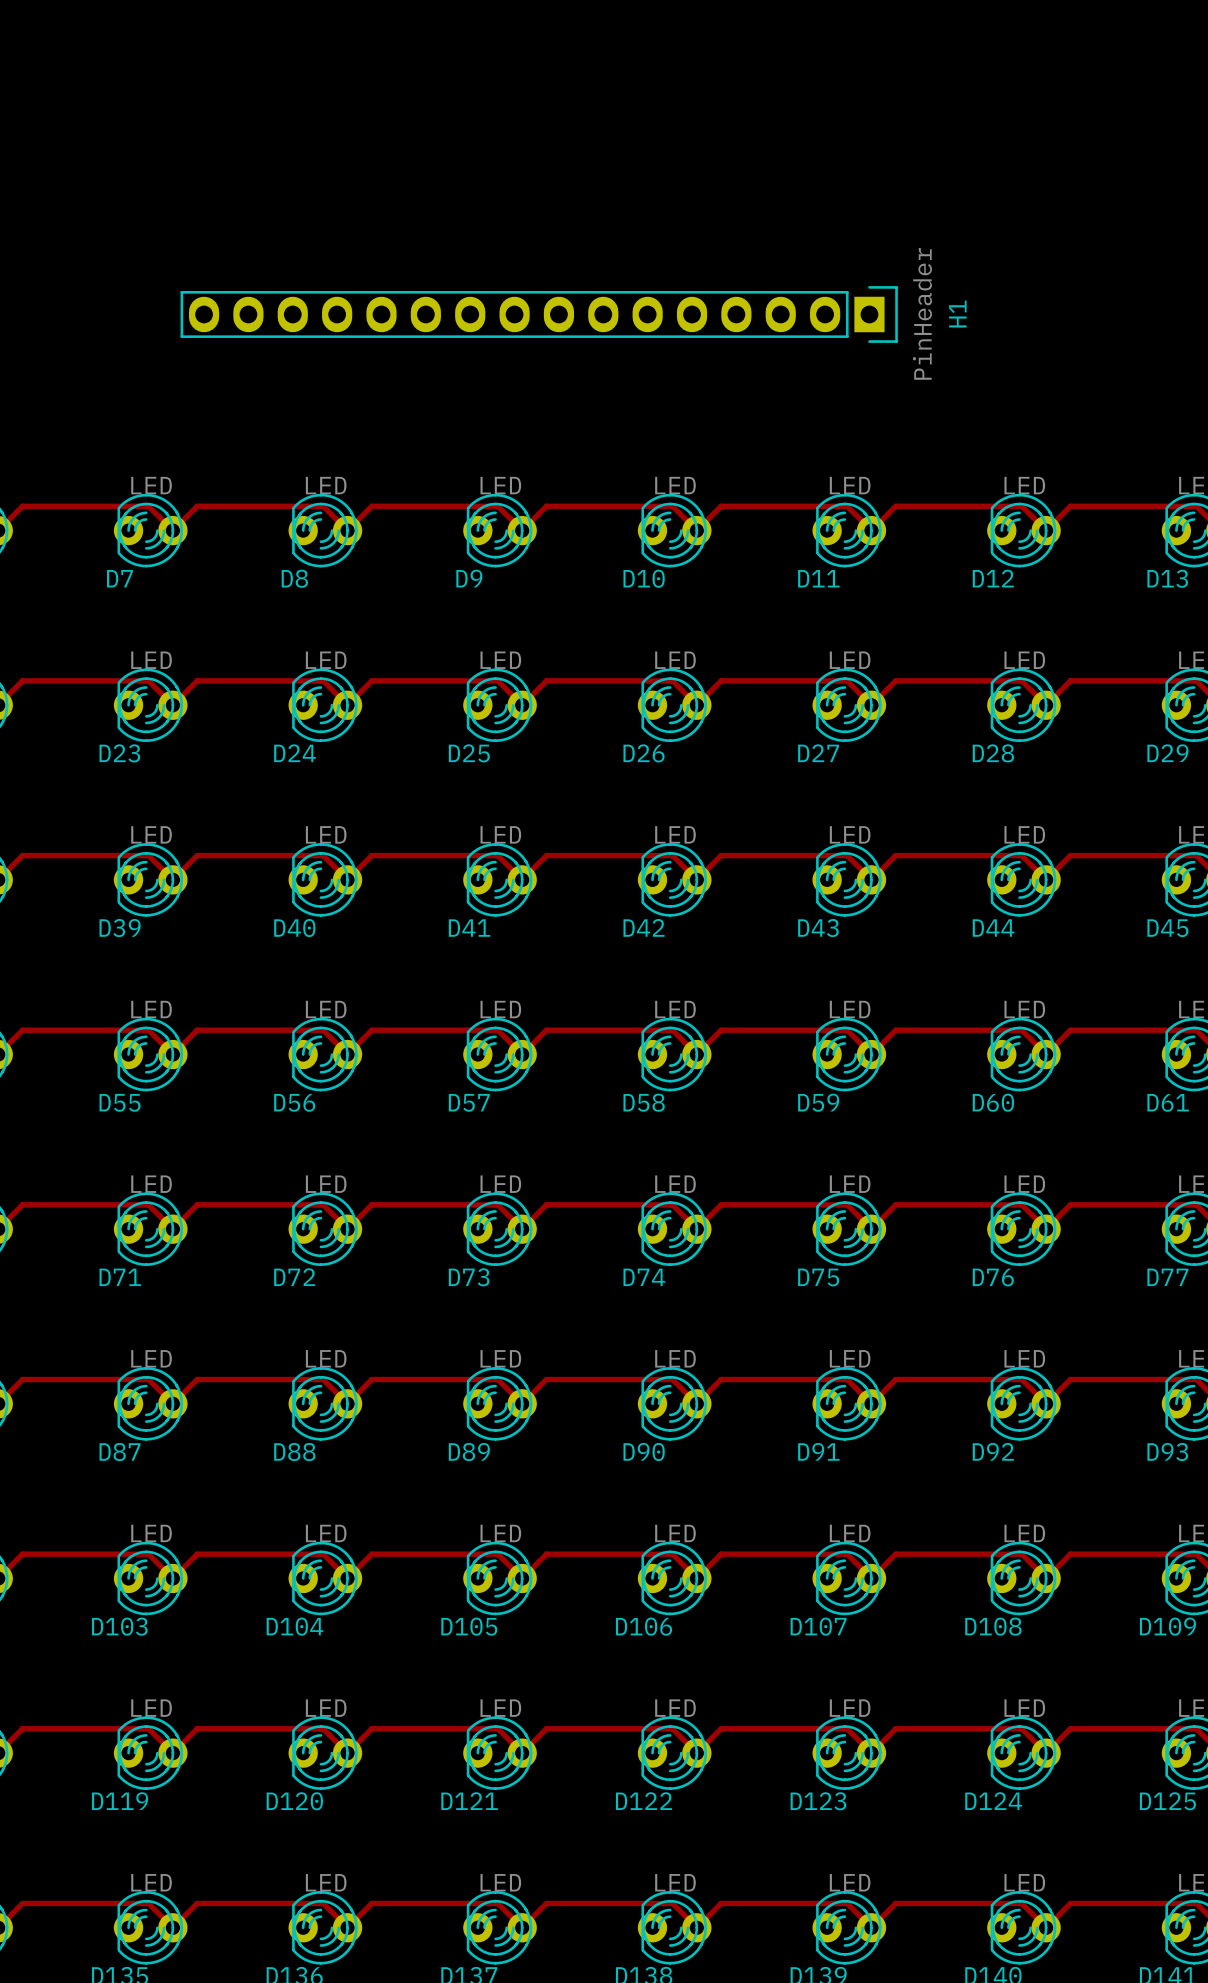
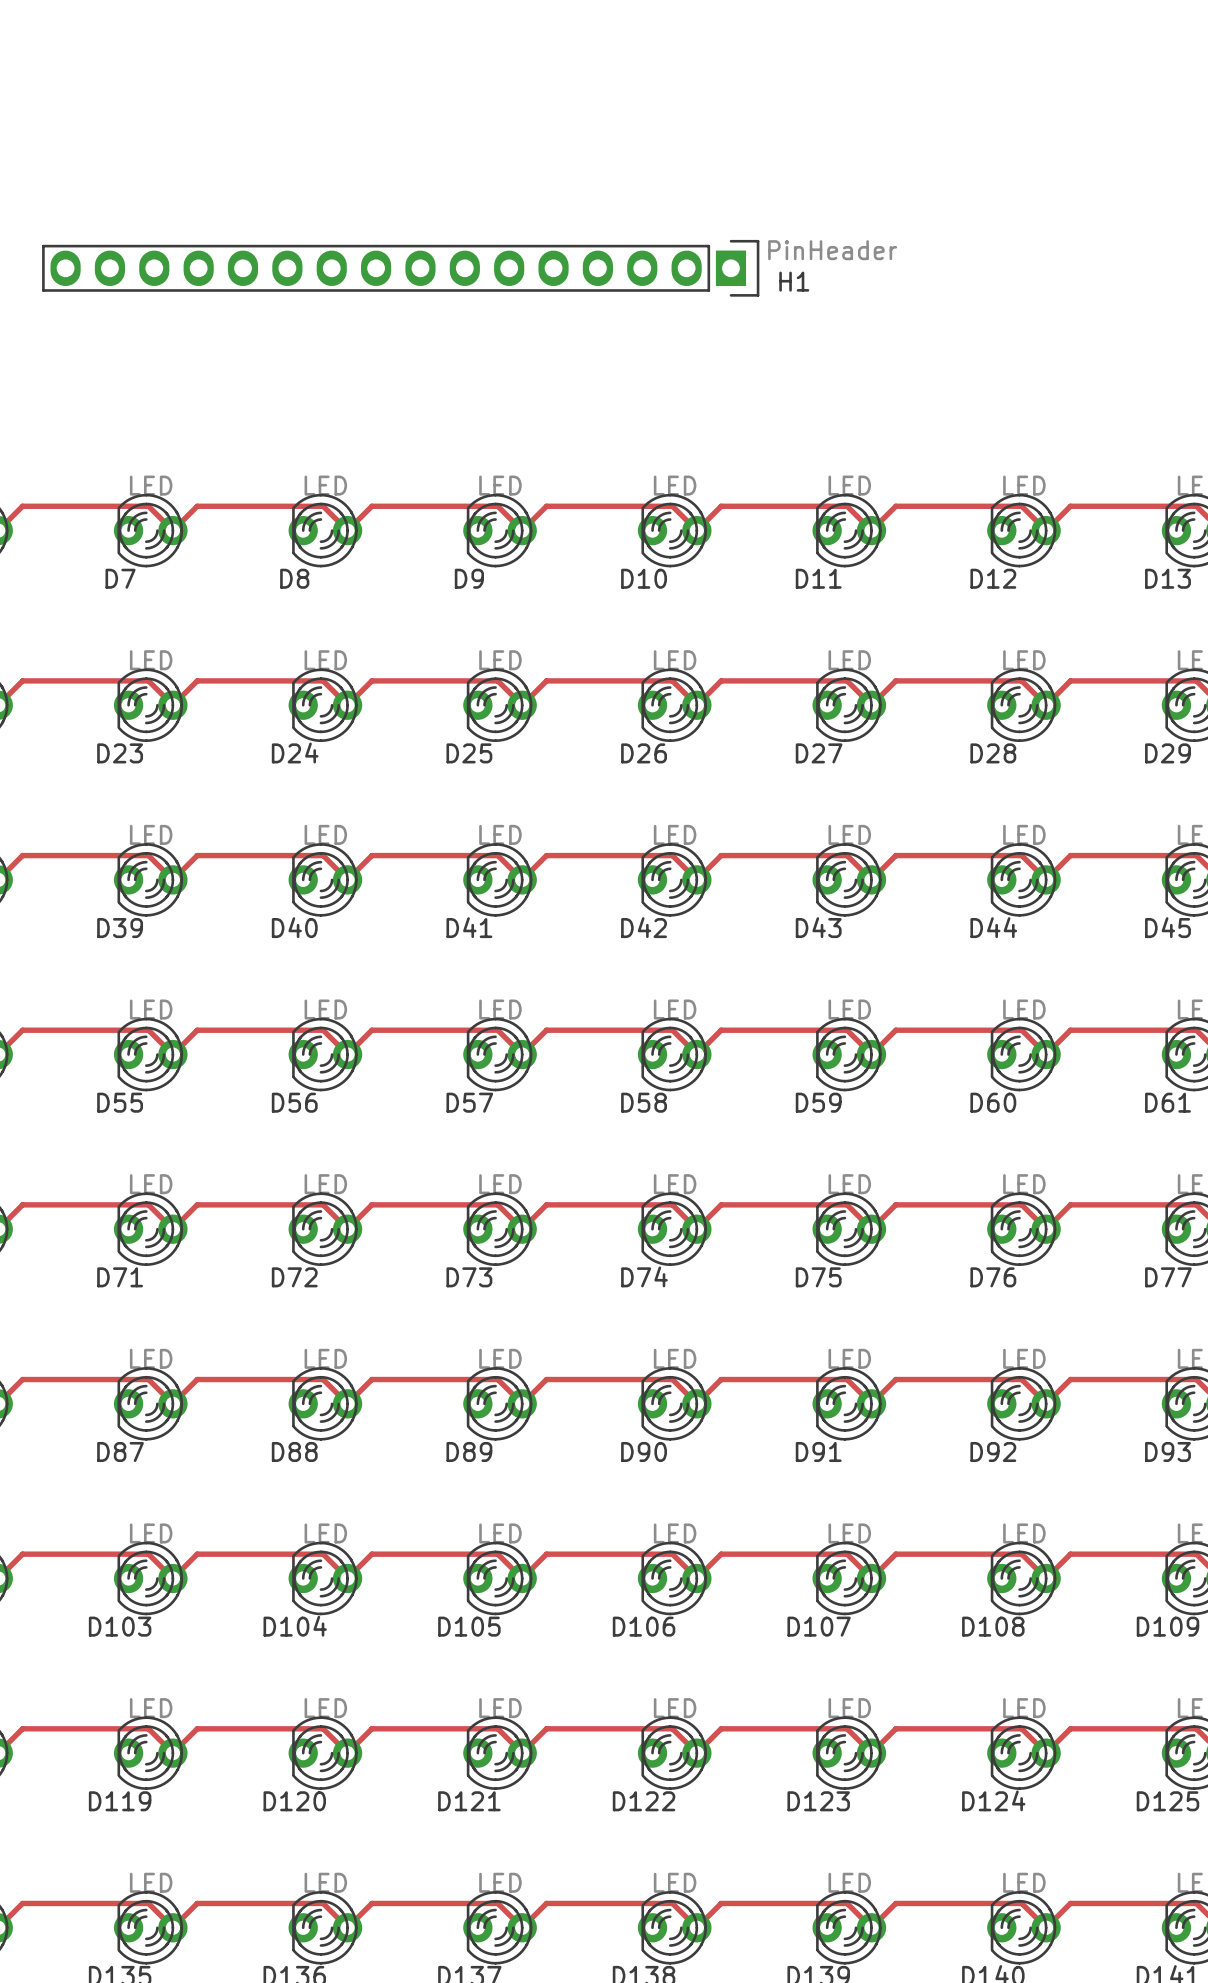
H1 value rotation: 0° (922, 313) -> 90° clockwise (832, 250)
H1 position: (539, 314) -> (400, 268)
H1 name rotation: 0° (957, 314) -> 90° clockwise (794, 281)

